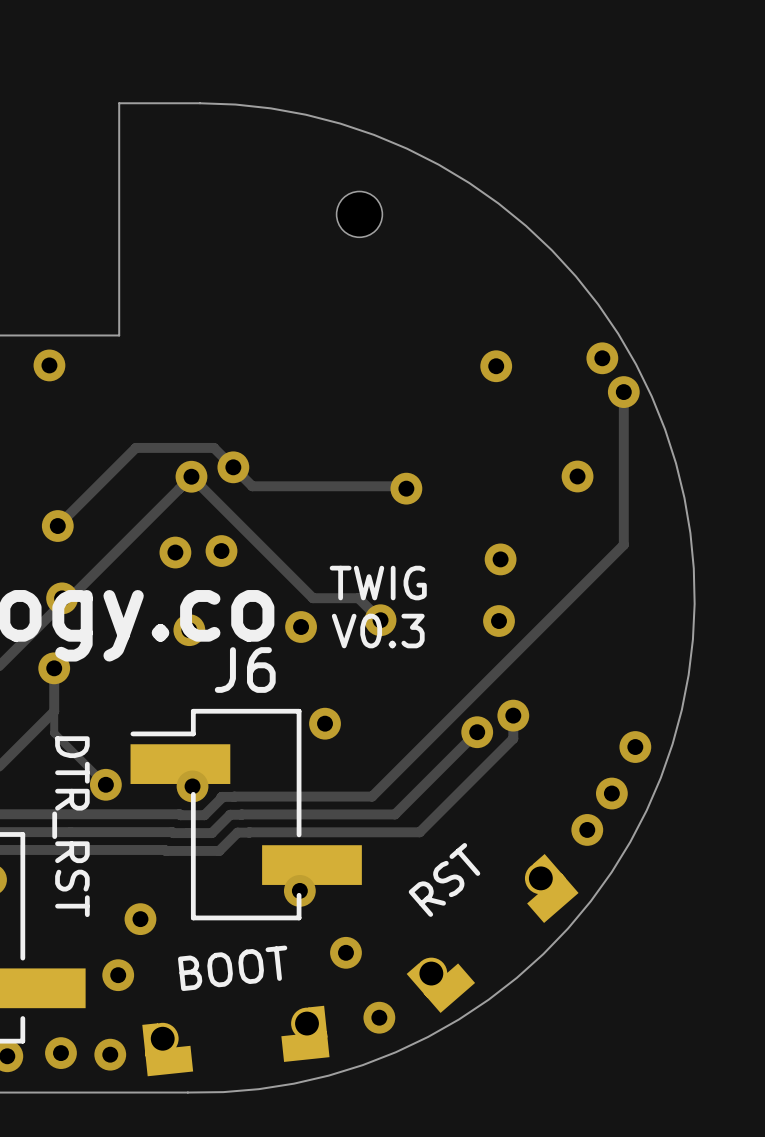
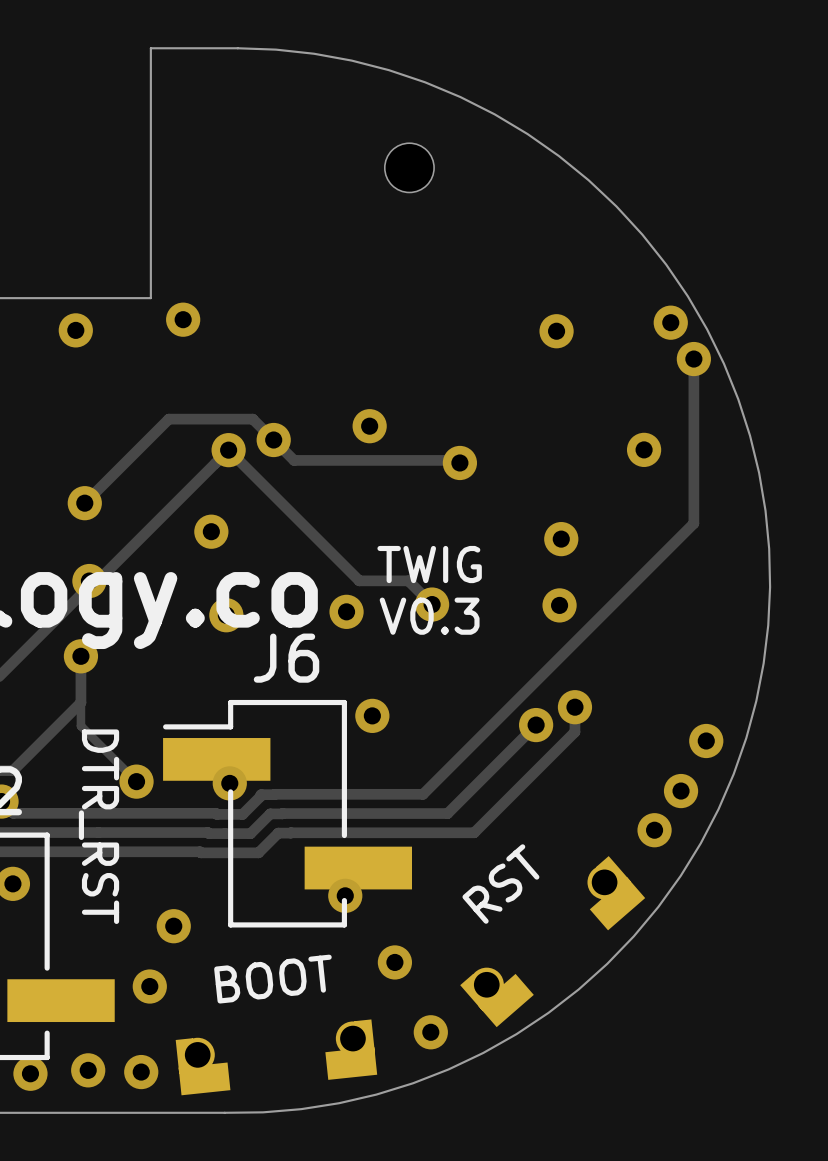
via: none -> (183, 319)
via: none -> (369, 426)
via: (221, 551) -> none

